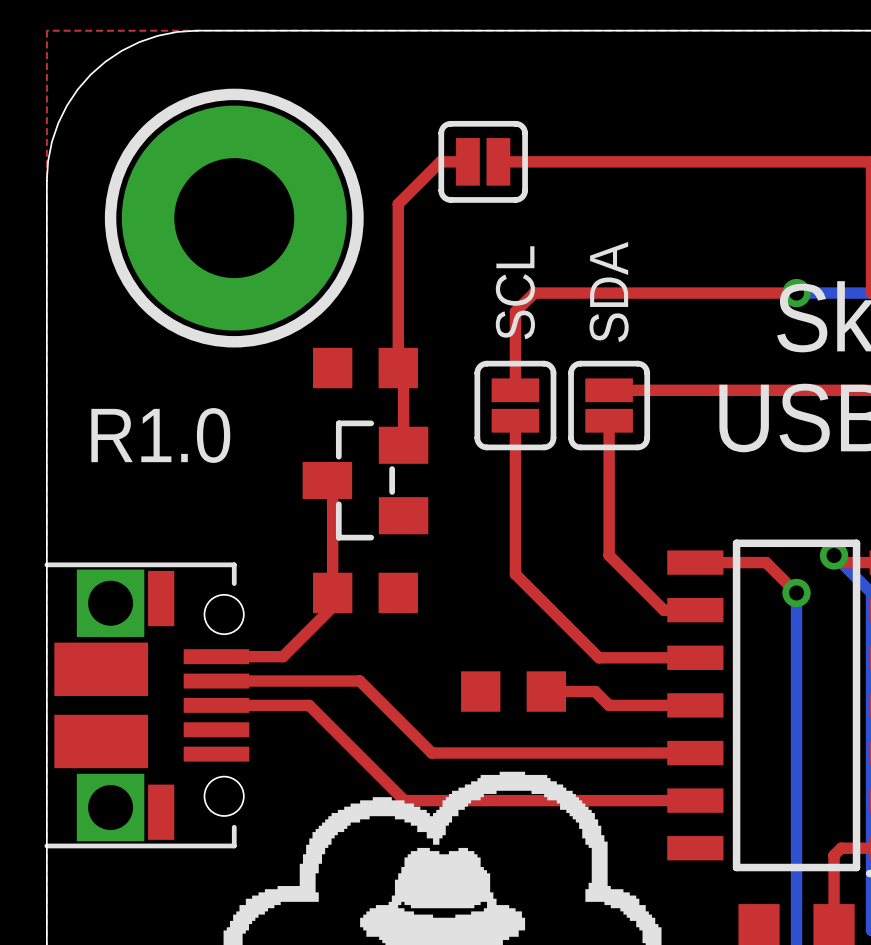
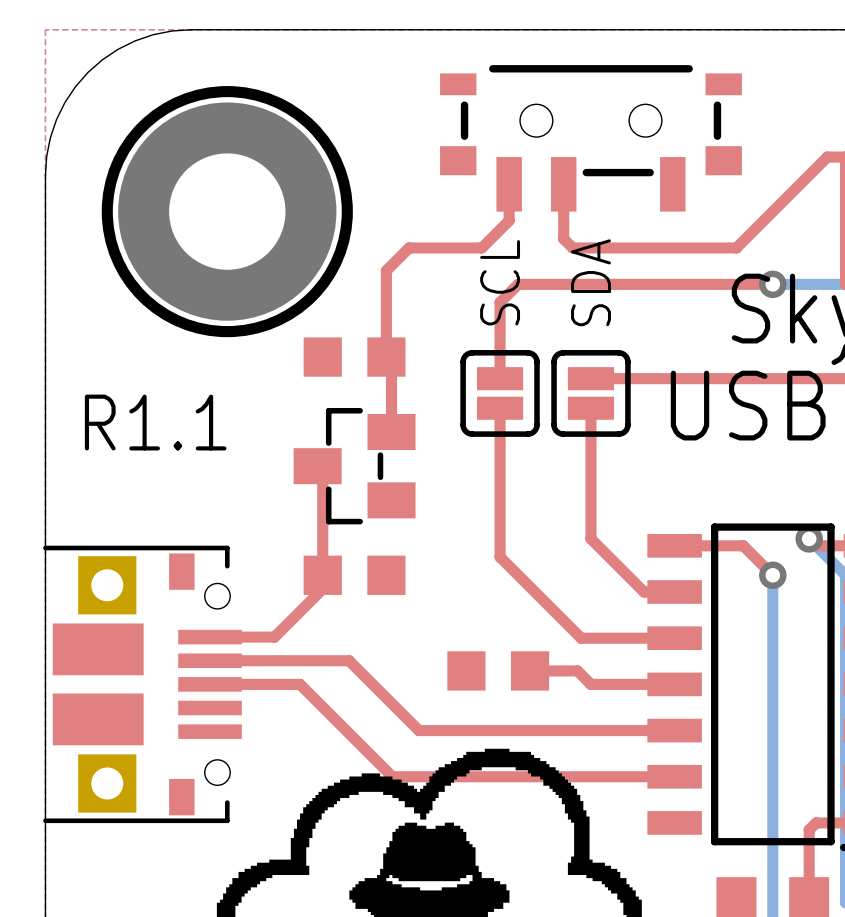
part: none -> (590, 138)
top track: (467, 161) (440, 161) (398, 204) (398, 279) -> (509, 184) (509, 220) (481, 247) (409, 247) (386, 270)
part: (483, 161) -> none
top track: (498, 161) (852, 161) -> (563, 184) (563, 238) (572, 247) (736, 247) (827, 157)
text: R1.0 (160, 435) -> R1.1 (155, 422)
part footprint: [44, 562, 250, 849] -> [43, 545, 242, 824]

